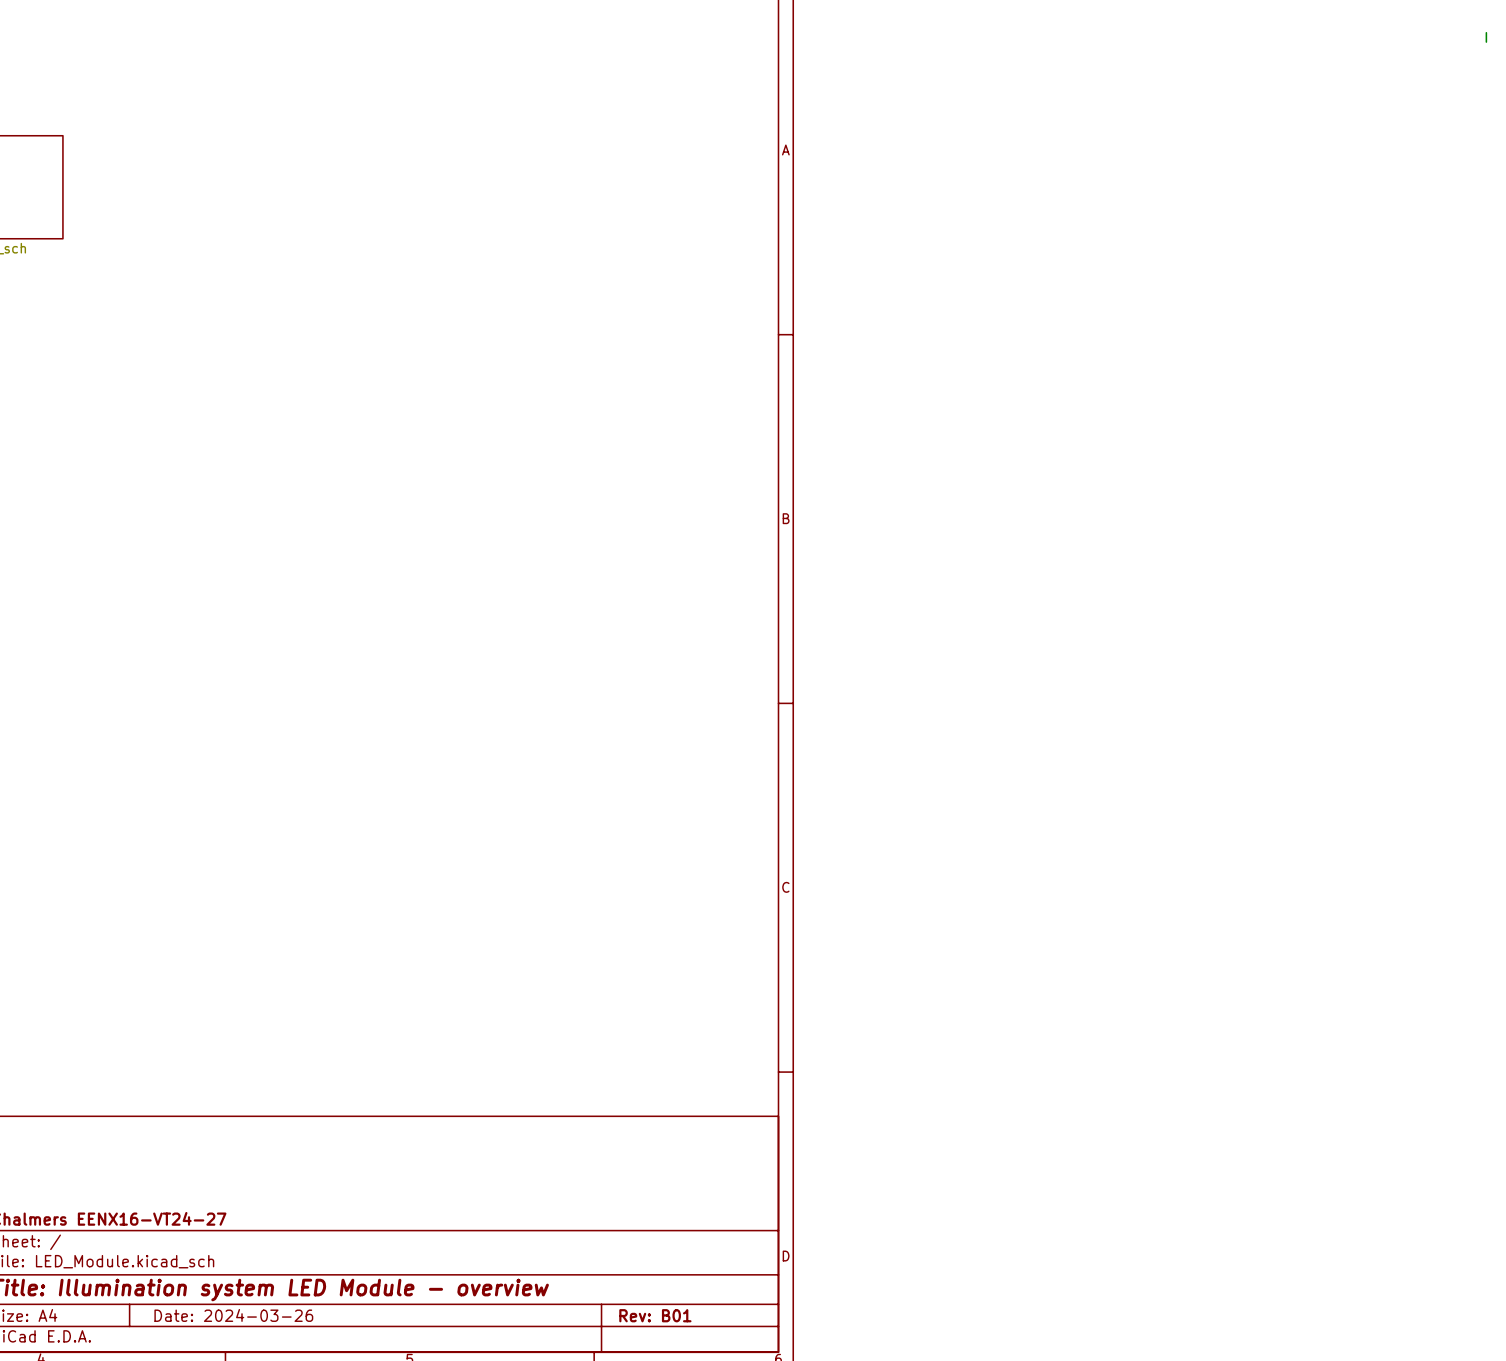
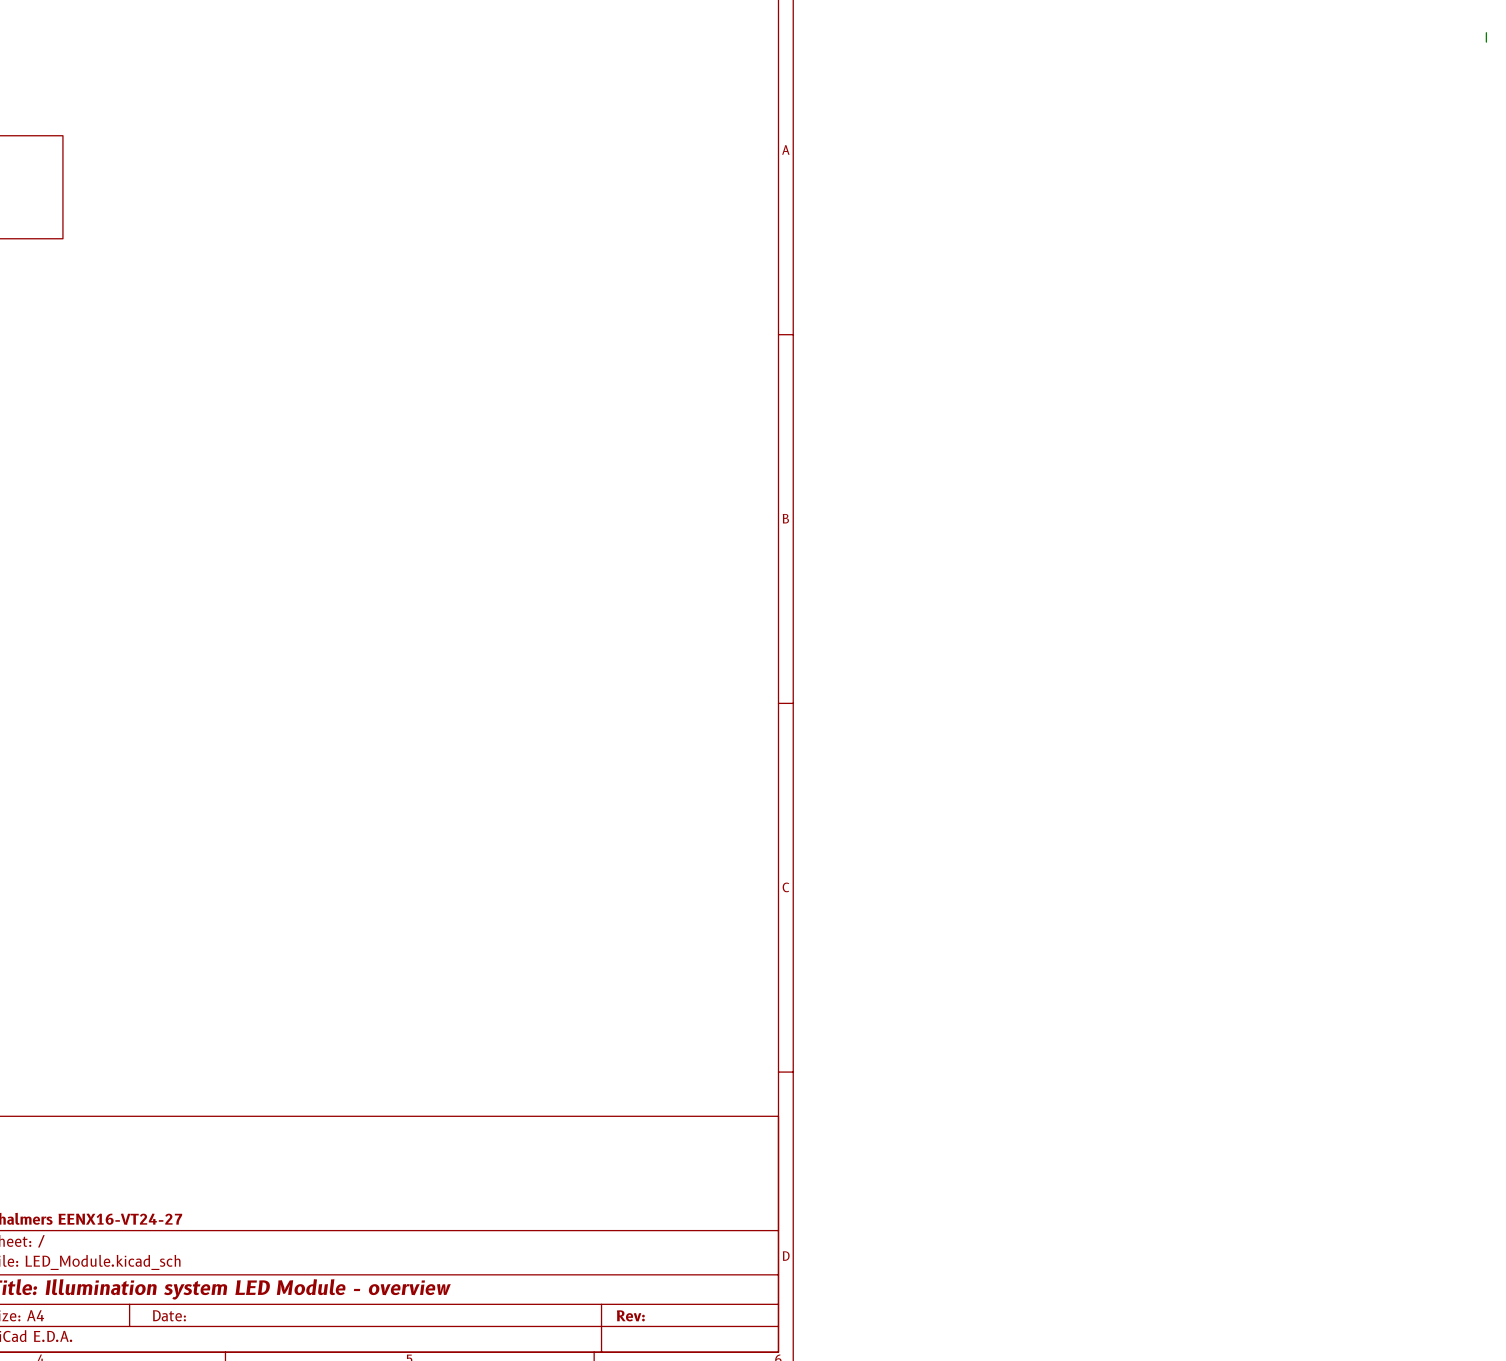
title block: Date: 2024-03-26 (233, 1315) -> Date: (169, 1315)
title block: Rev: B01 (655, 1315) -> Rev: (630, 1315)

